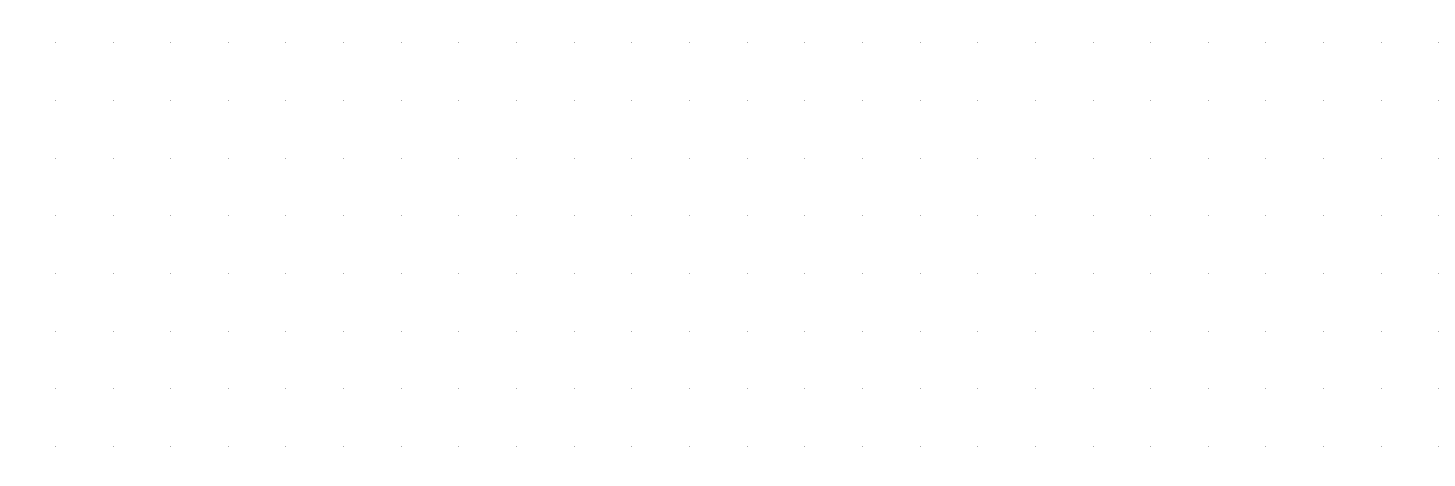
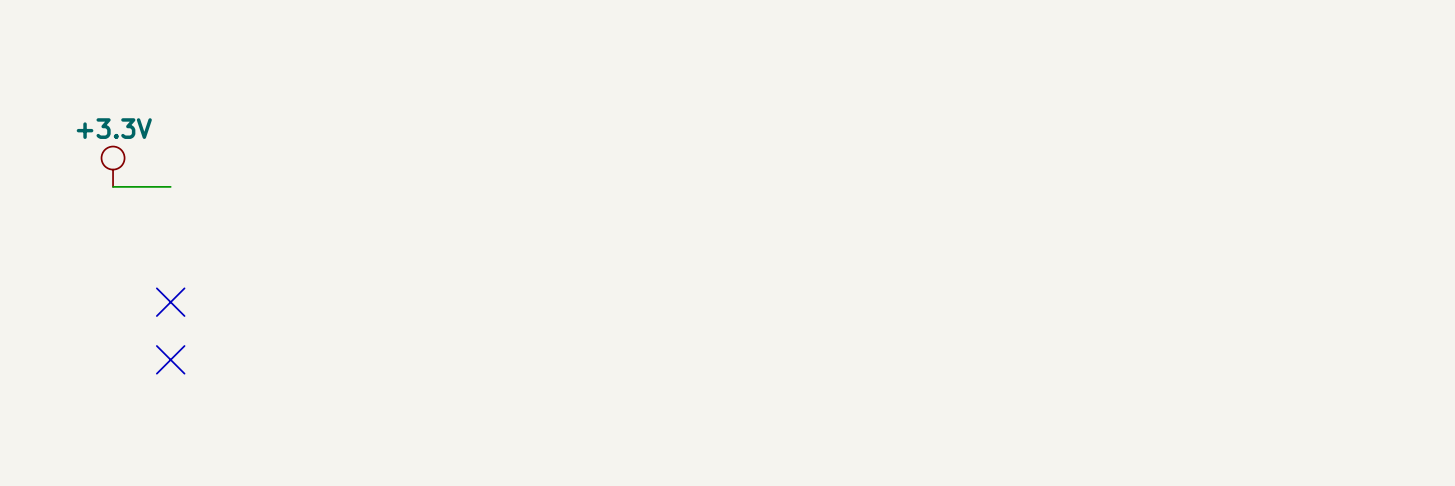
power symbol: none -> +3.3V (113, 166)
wire: none -> (113, 186) (170, 186)
no-connect mark: none -> (170, 302)
no-connect mark: none -> (170, 359)

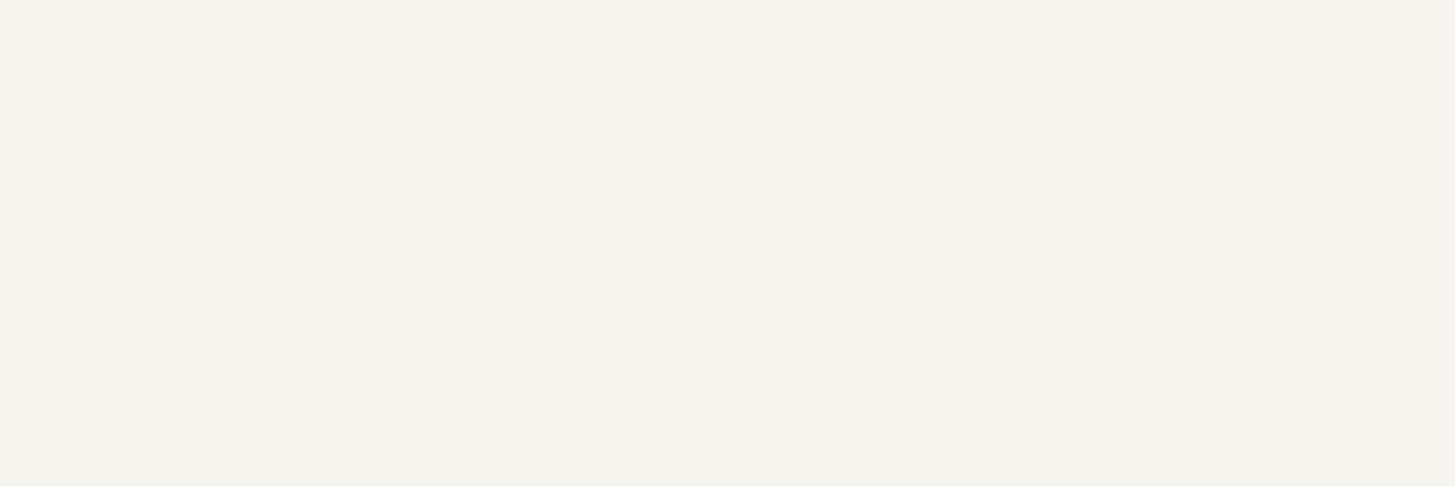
power symbol: +3.3V (113, 166) -> none
wire: (113, 186) (170, 186) -> none
no-connect mark: (170, 302) -> none
no-connect mark: (170, 359) -> none

